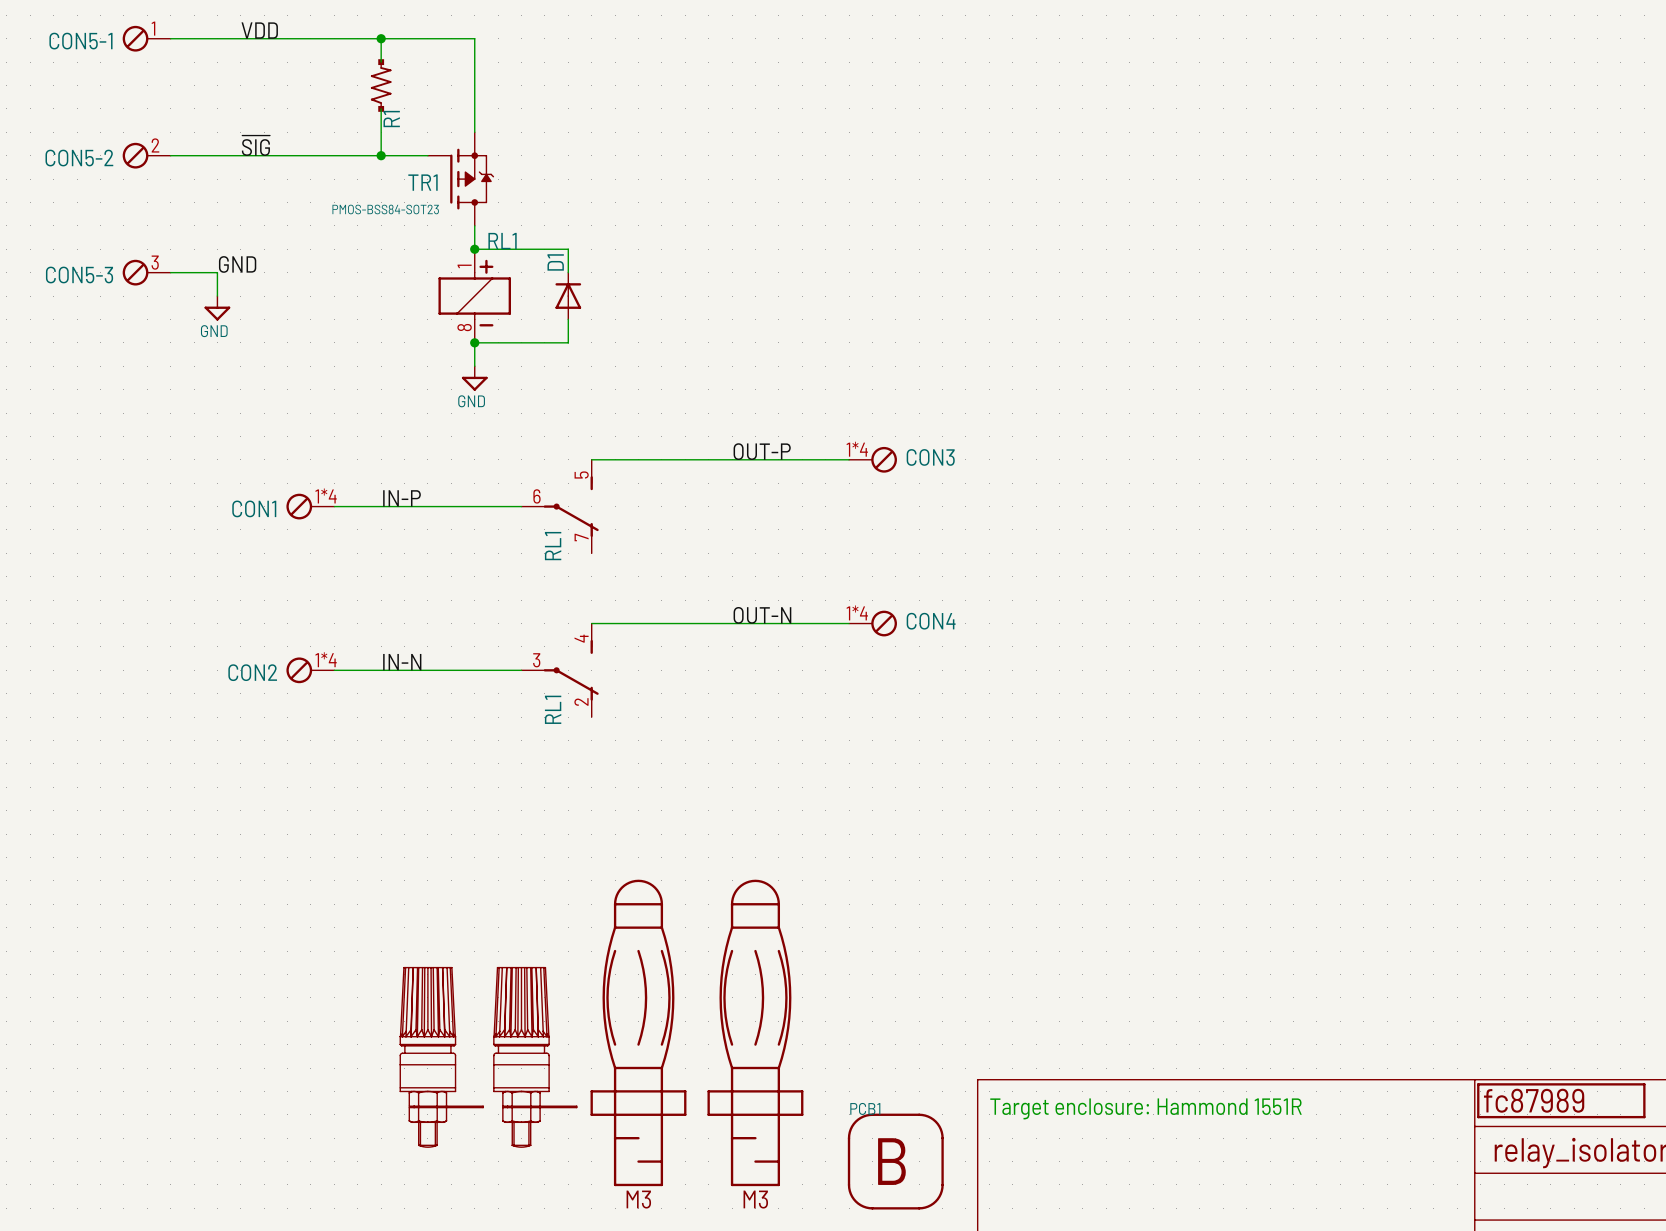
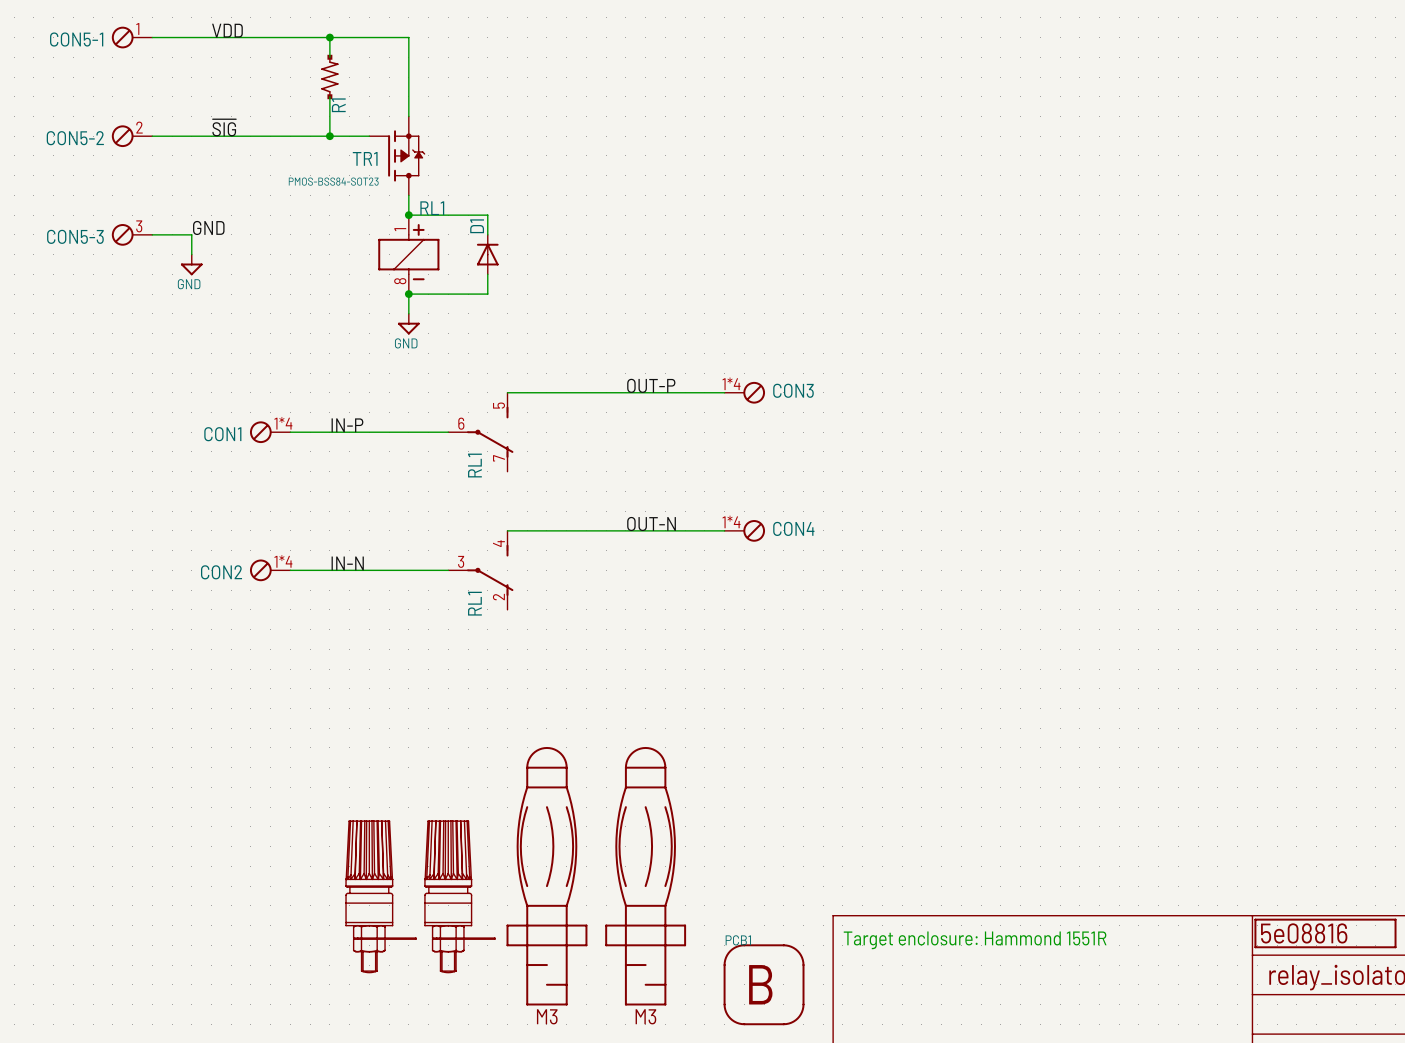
part value: fc87989 (1534, 1100) -> 5e08816 (1304, 933)

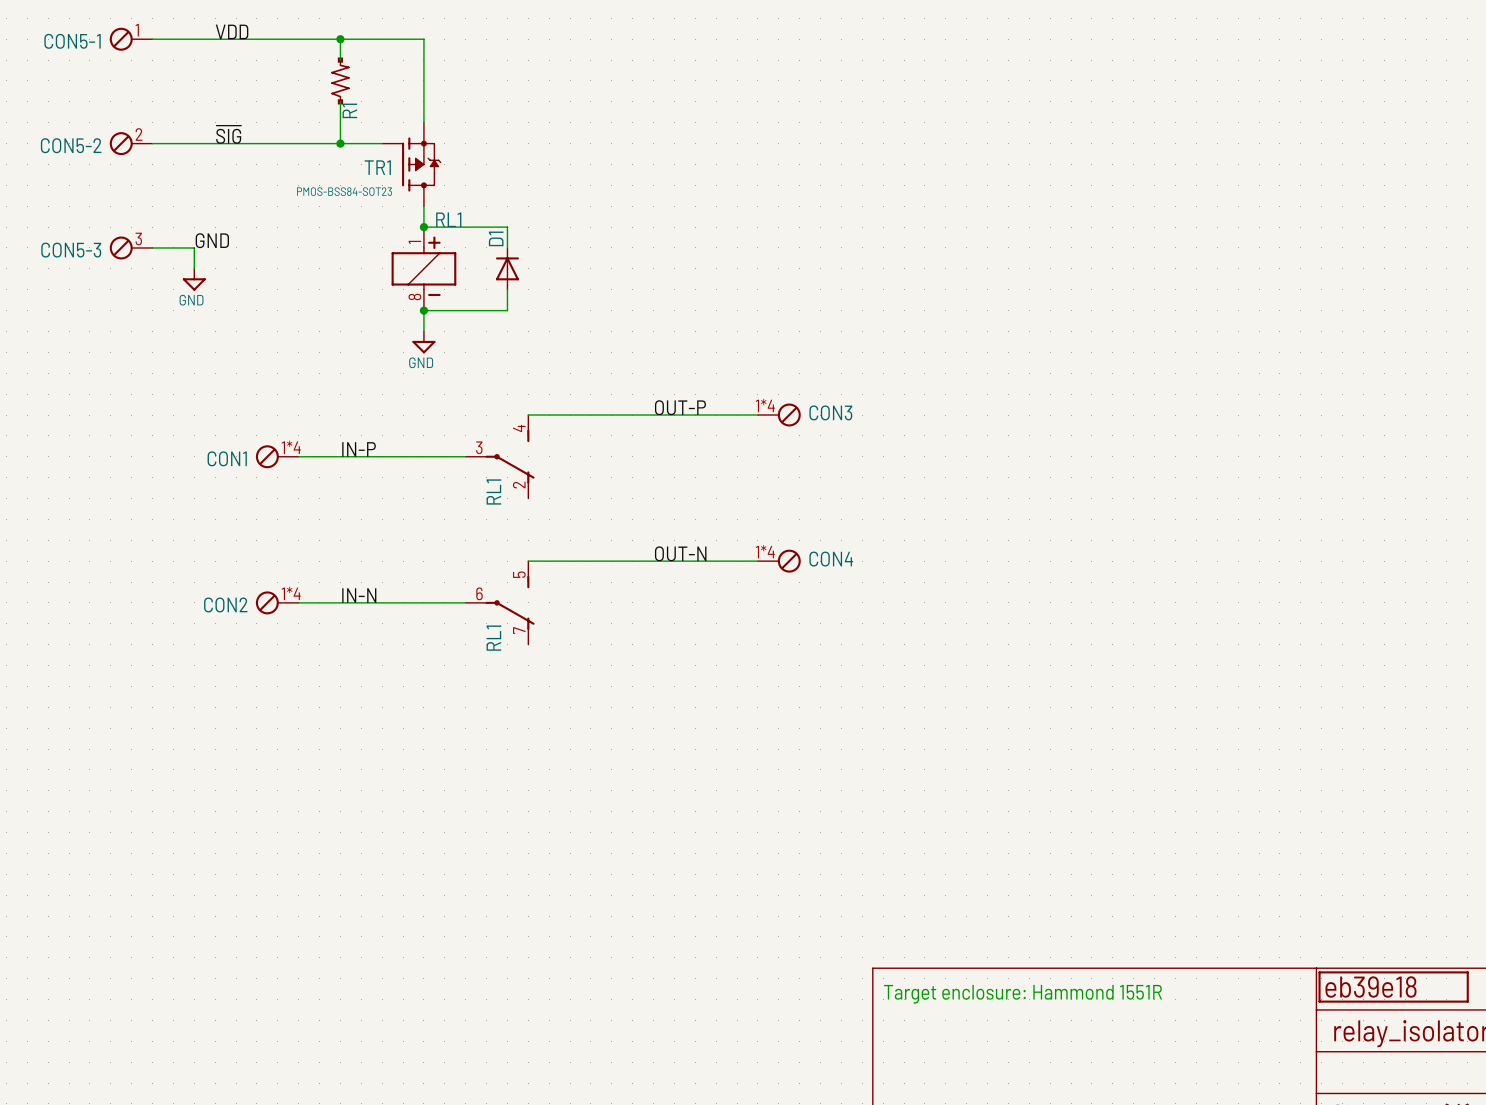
RL1 pin number: 5 (499, 405) -> 4 (519, 428)
RL1 pin number: 6 (461, 423) -> 3 (479, 447)
RL1 pin number: 7 (498, 458) -> 2 (519, 484)
RL1 pin number: 4 (498, 543) -> 5 (519, 574)
RL1 pin number: 3 (461, 561) -> 6 (479, 593)
RL1 pin number: 2 (498, 597) -> 7 (519, 630)
part: (546, 876) -> none
part: (645, 876) -> none
part: (380, 896) -> none
part: (459, 896) -> none
part value: 5e08816 (1304, 933) -> eb39e18 (1371, 986)
PCB1: (764, 984) -> none

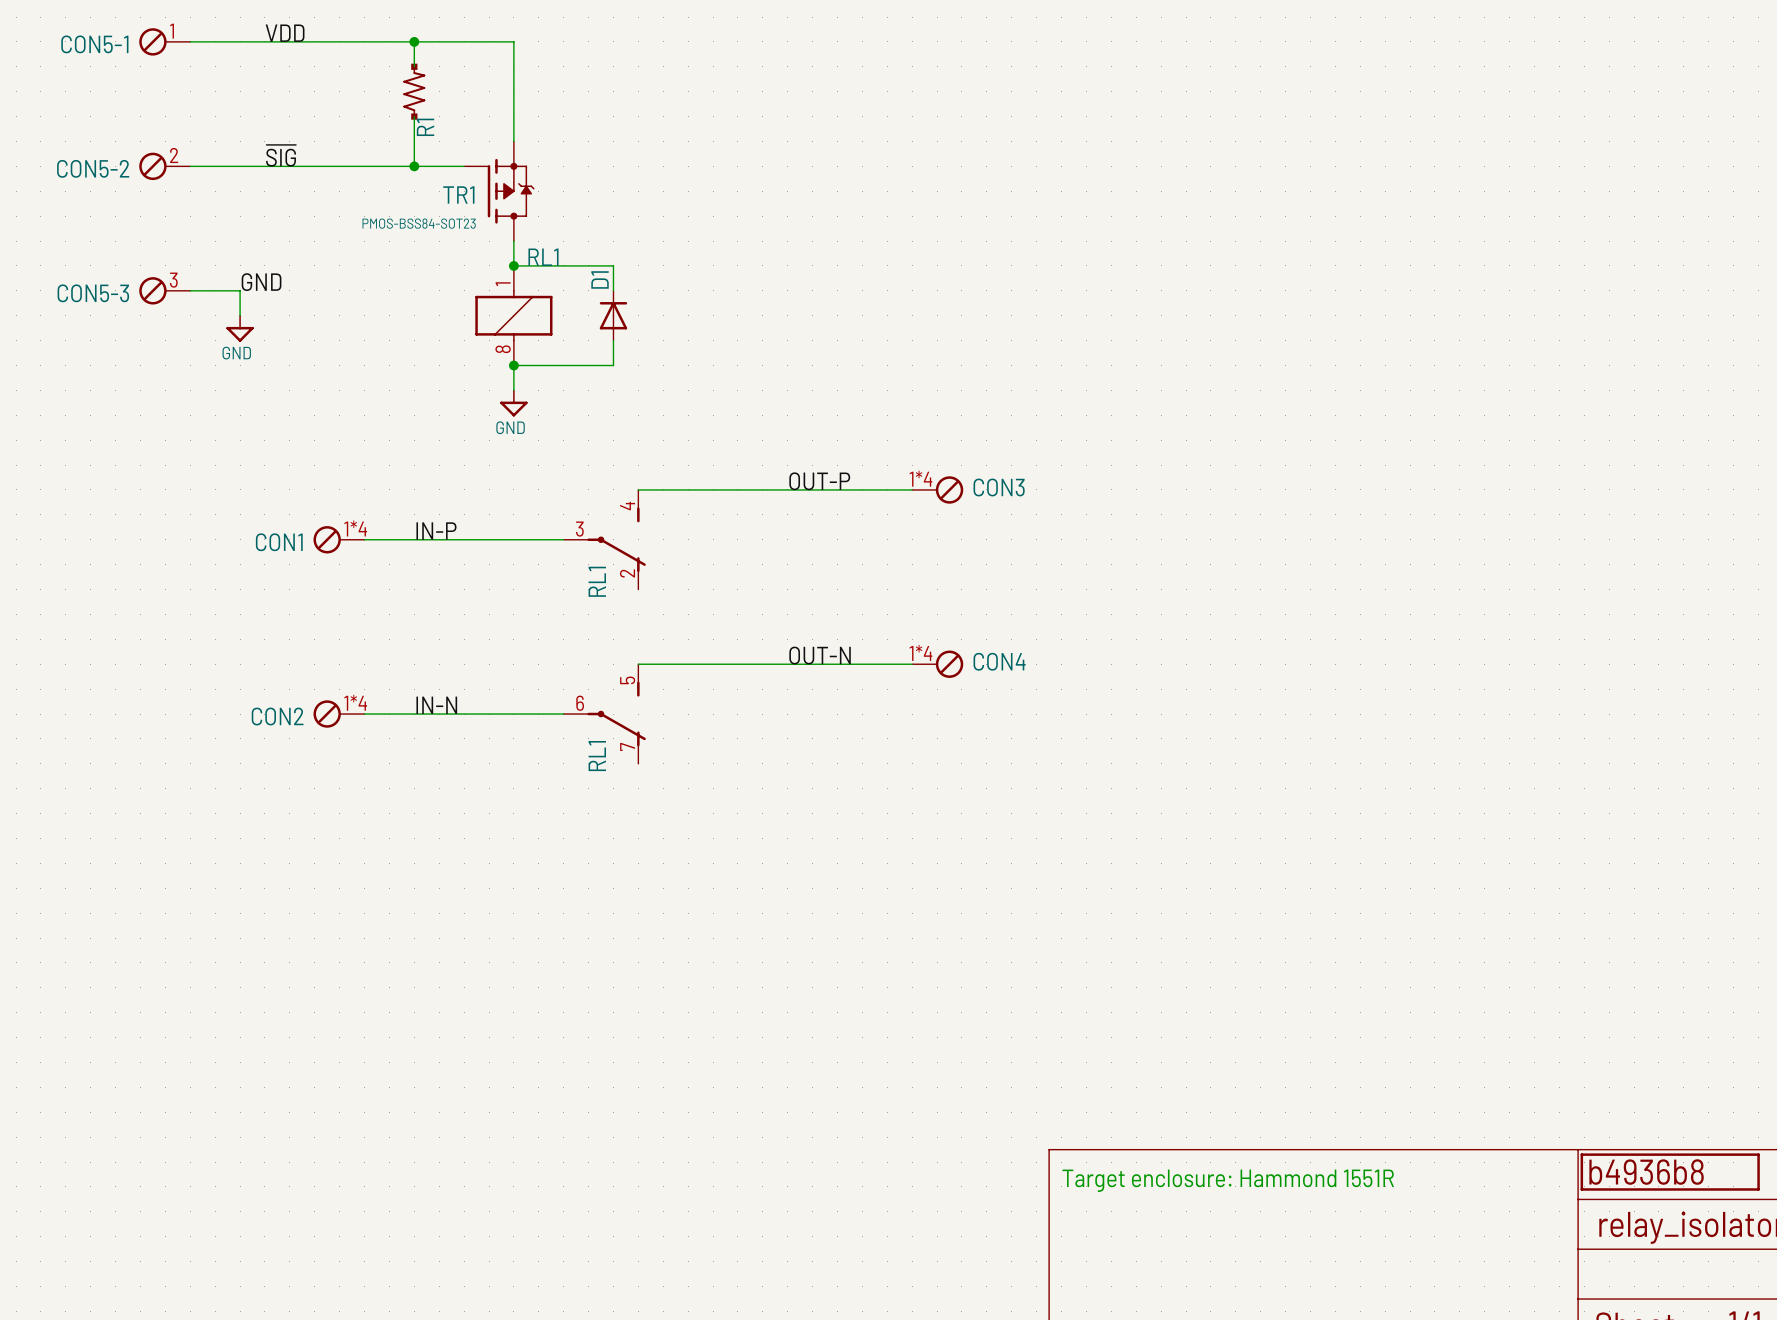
RL1 symbol: [391, 227, 457, 311] -> [475, 265, 553, 366]
part value: eb39e18 (1371, 986) -> b4936b8 (1646, 1172)

